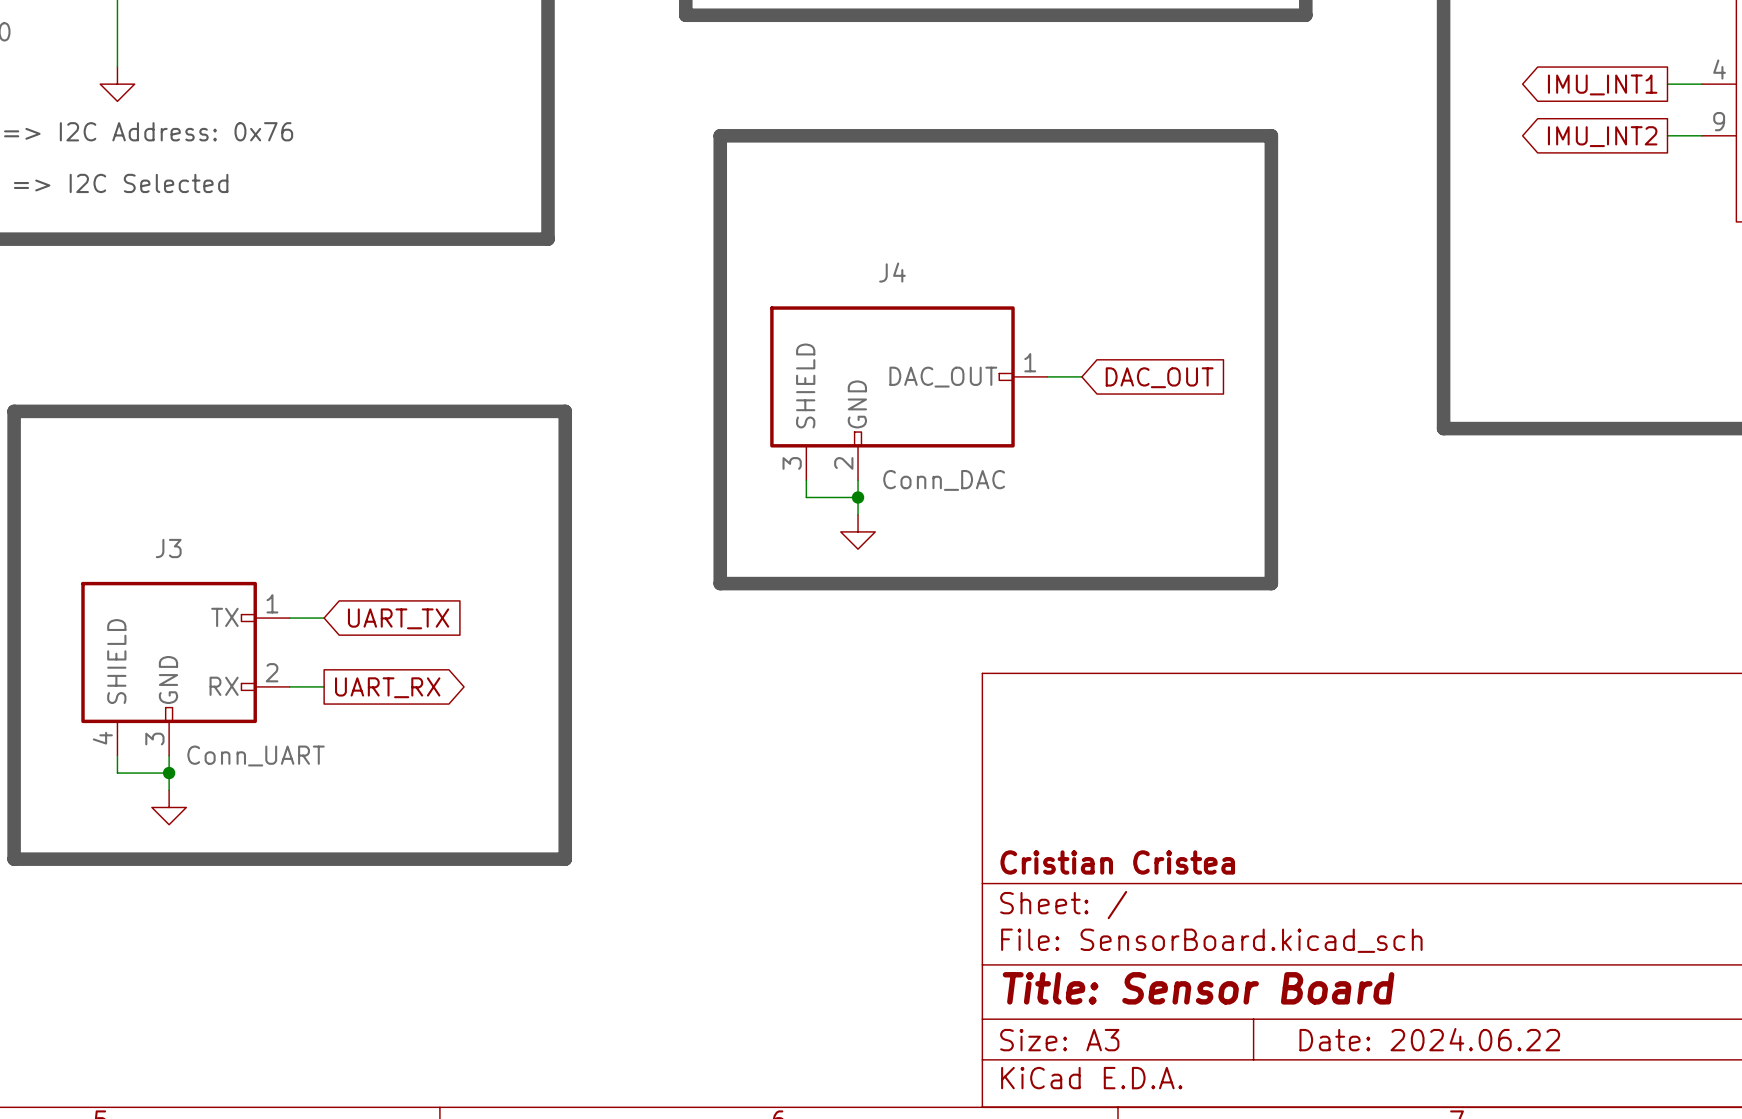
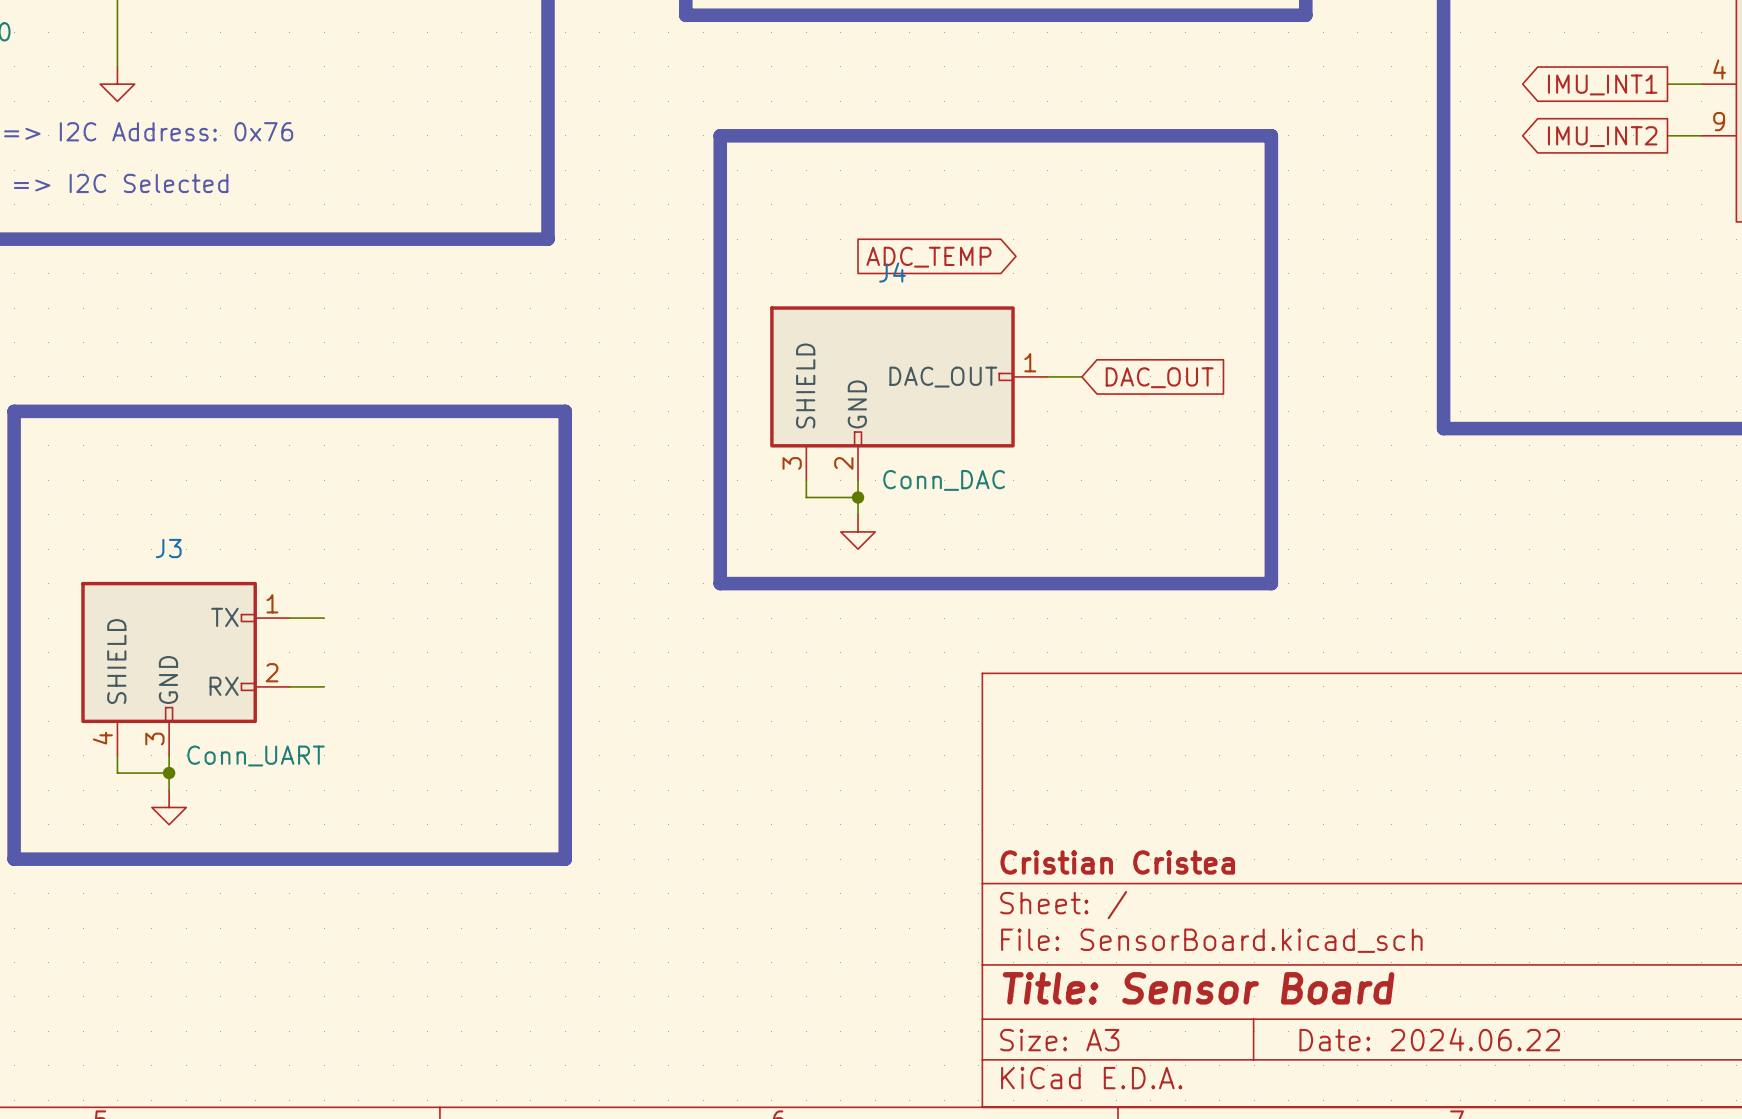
global label: none -> ADC_TEMP (928, 257)
global label: UART_TX (398, 618) -> none
global label: UART_RX (387, 687) -> none

